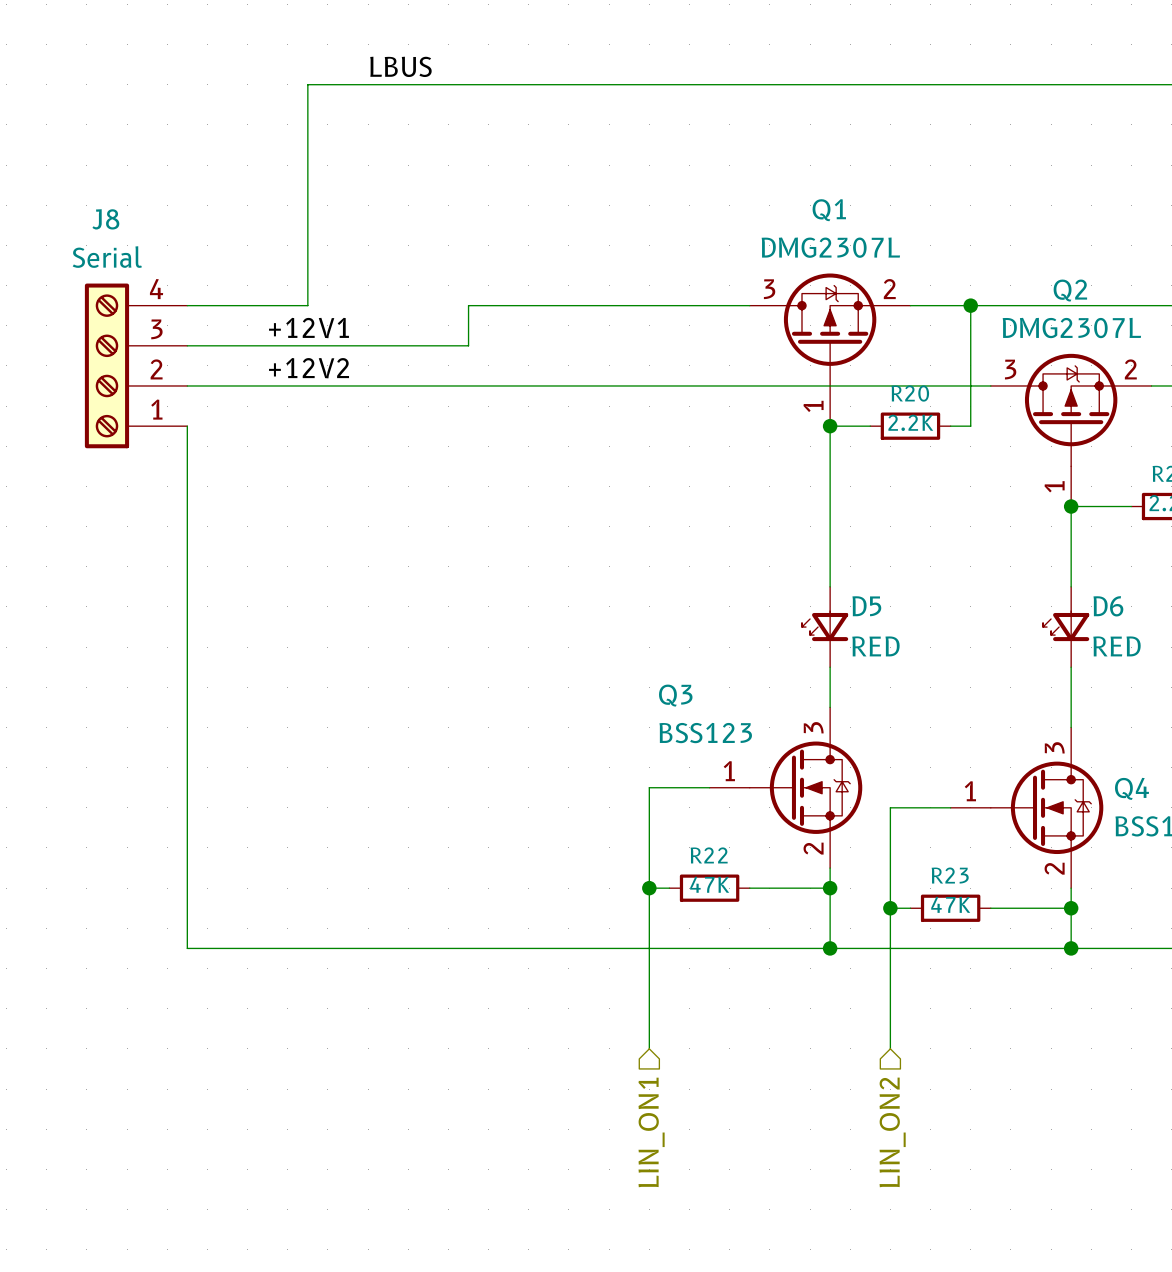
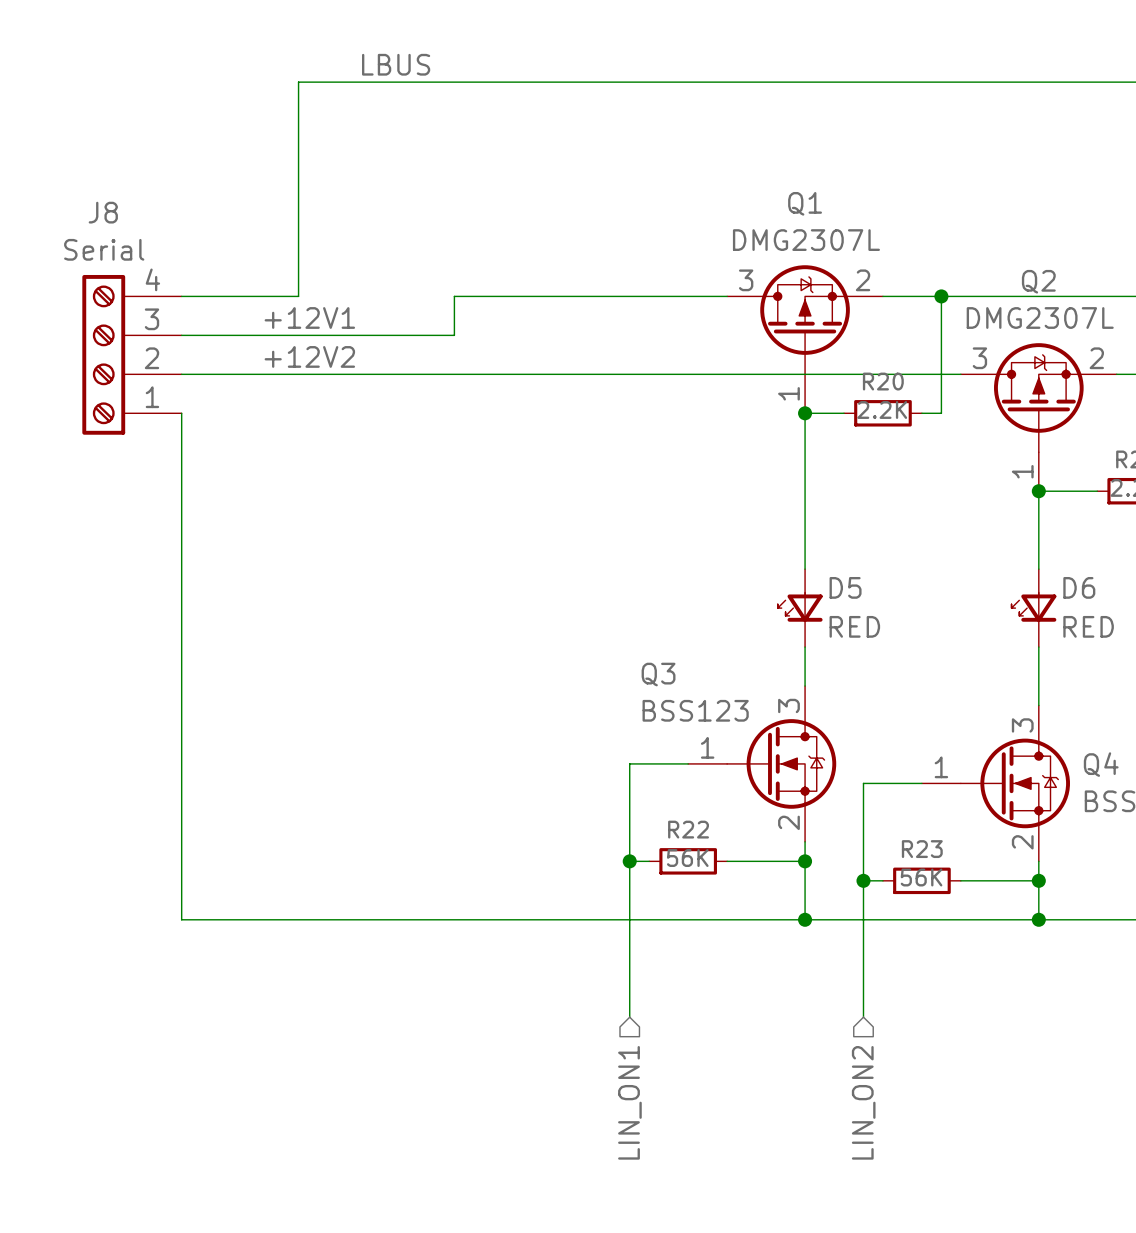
R22 value: 47K (709, 884) -> 56K (687, 858)
R23 value: 47K (950, 904) -> 56K (921, 877)

